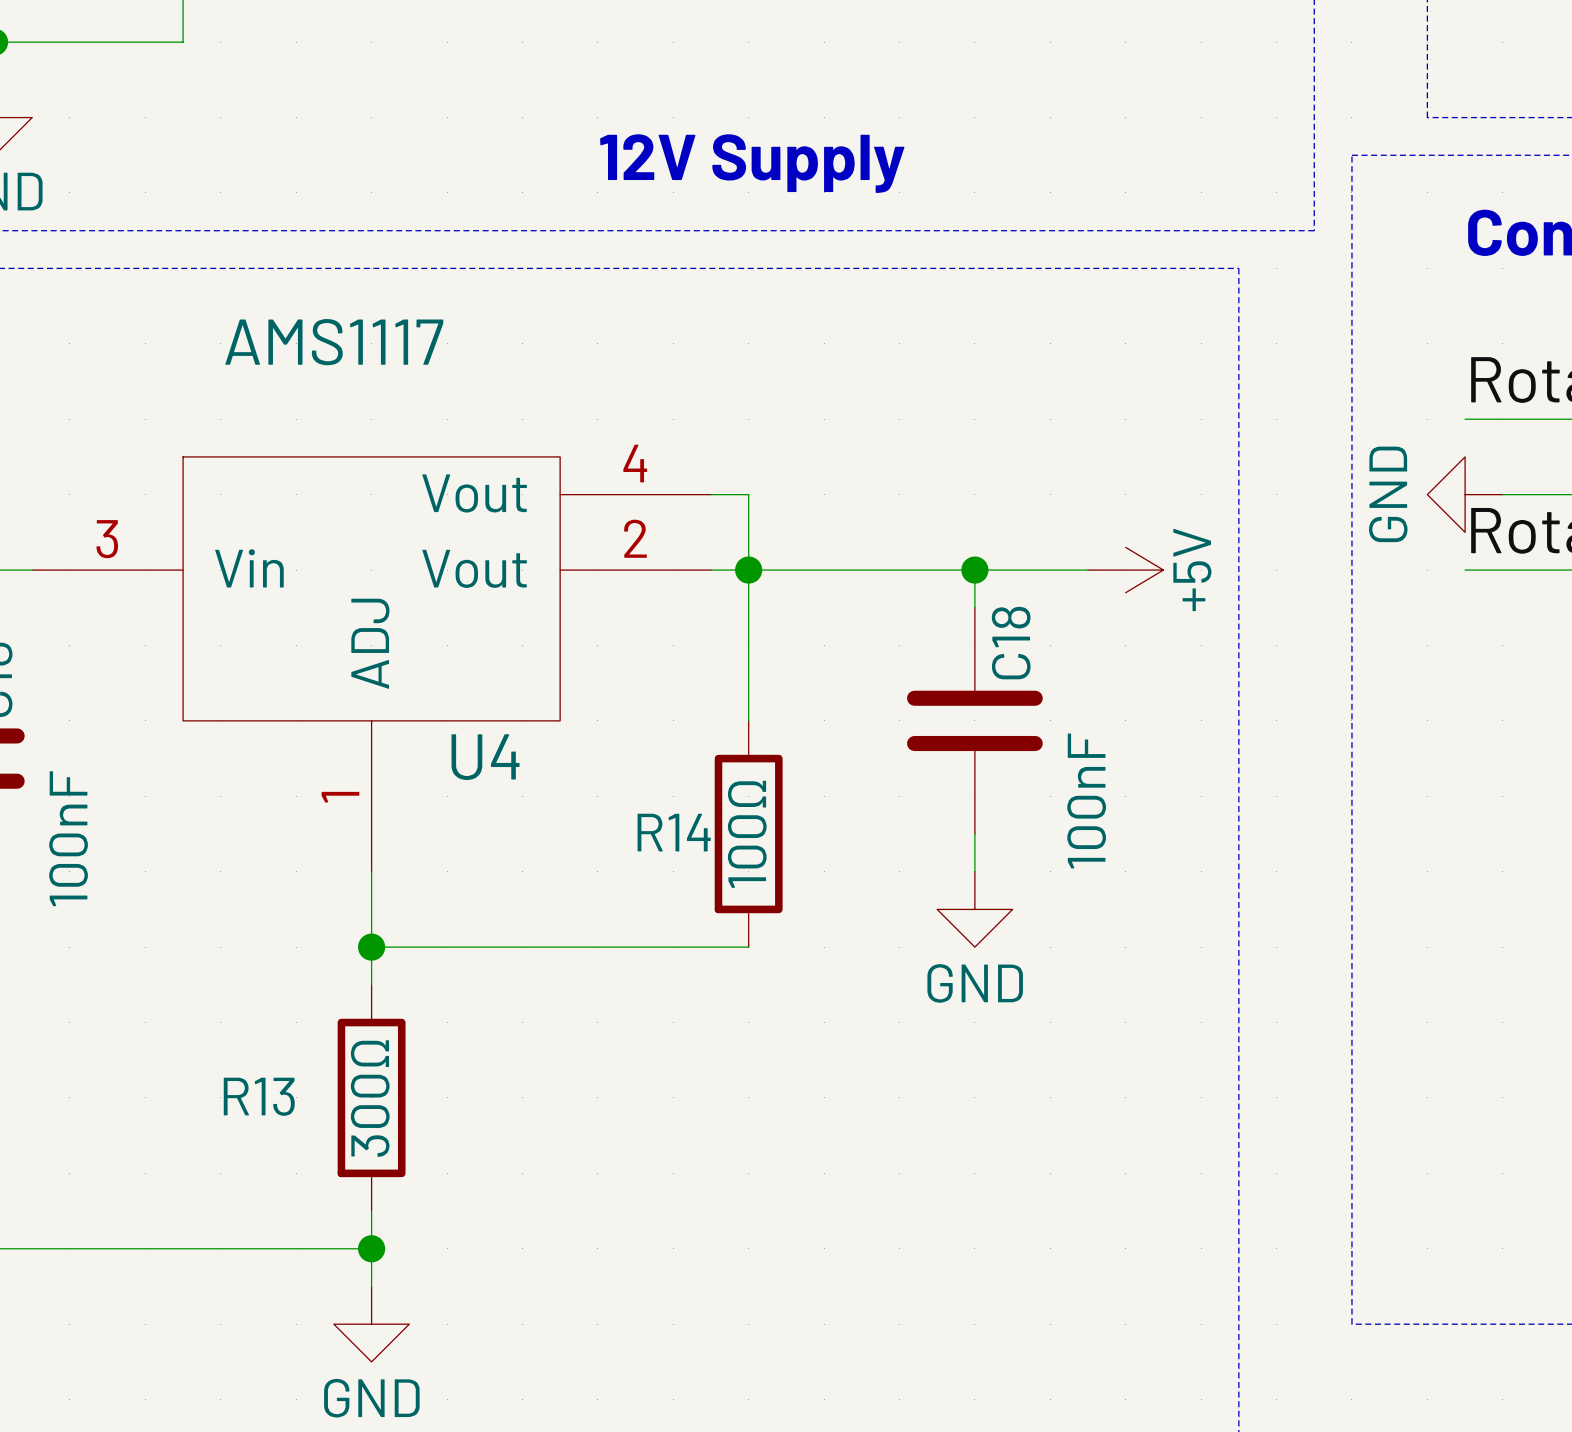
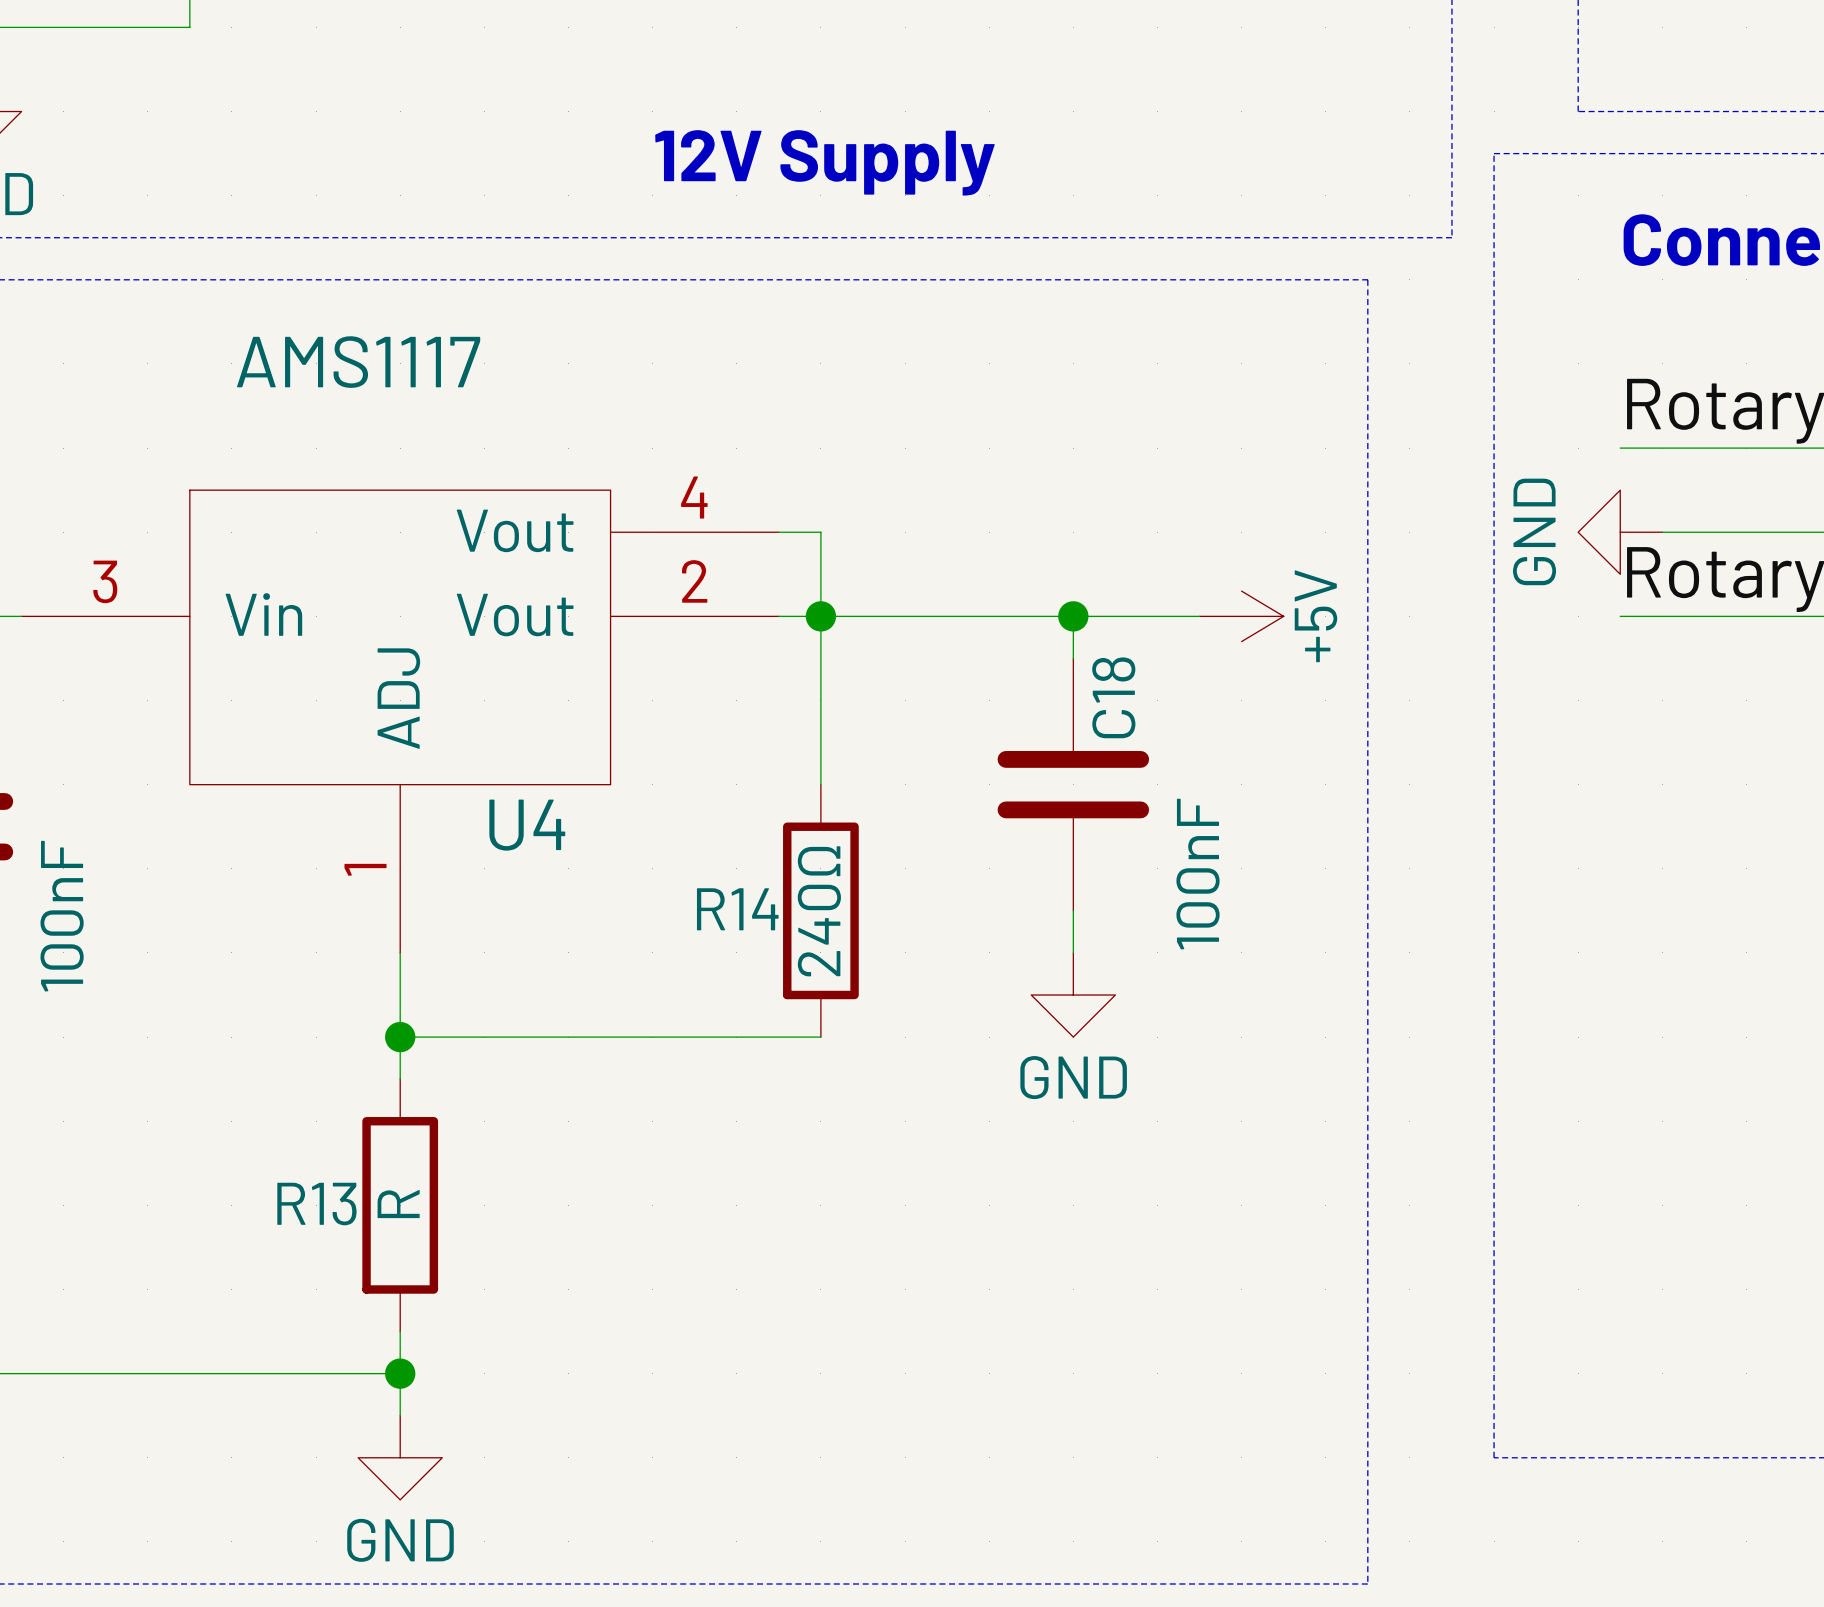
R14 value: 100Ω (747, 834) -> 240Ω (819, 911)
R13 name position: R13 (259, 1096) -> R13 (316, 1204)
R13 value: 300Ω (370, 1098) -> R (398, 1204)

